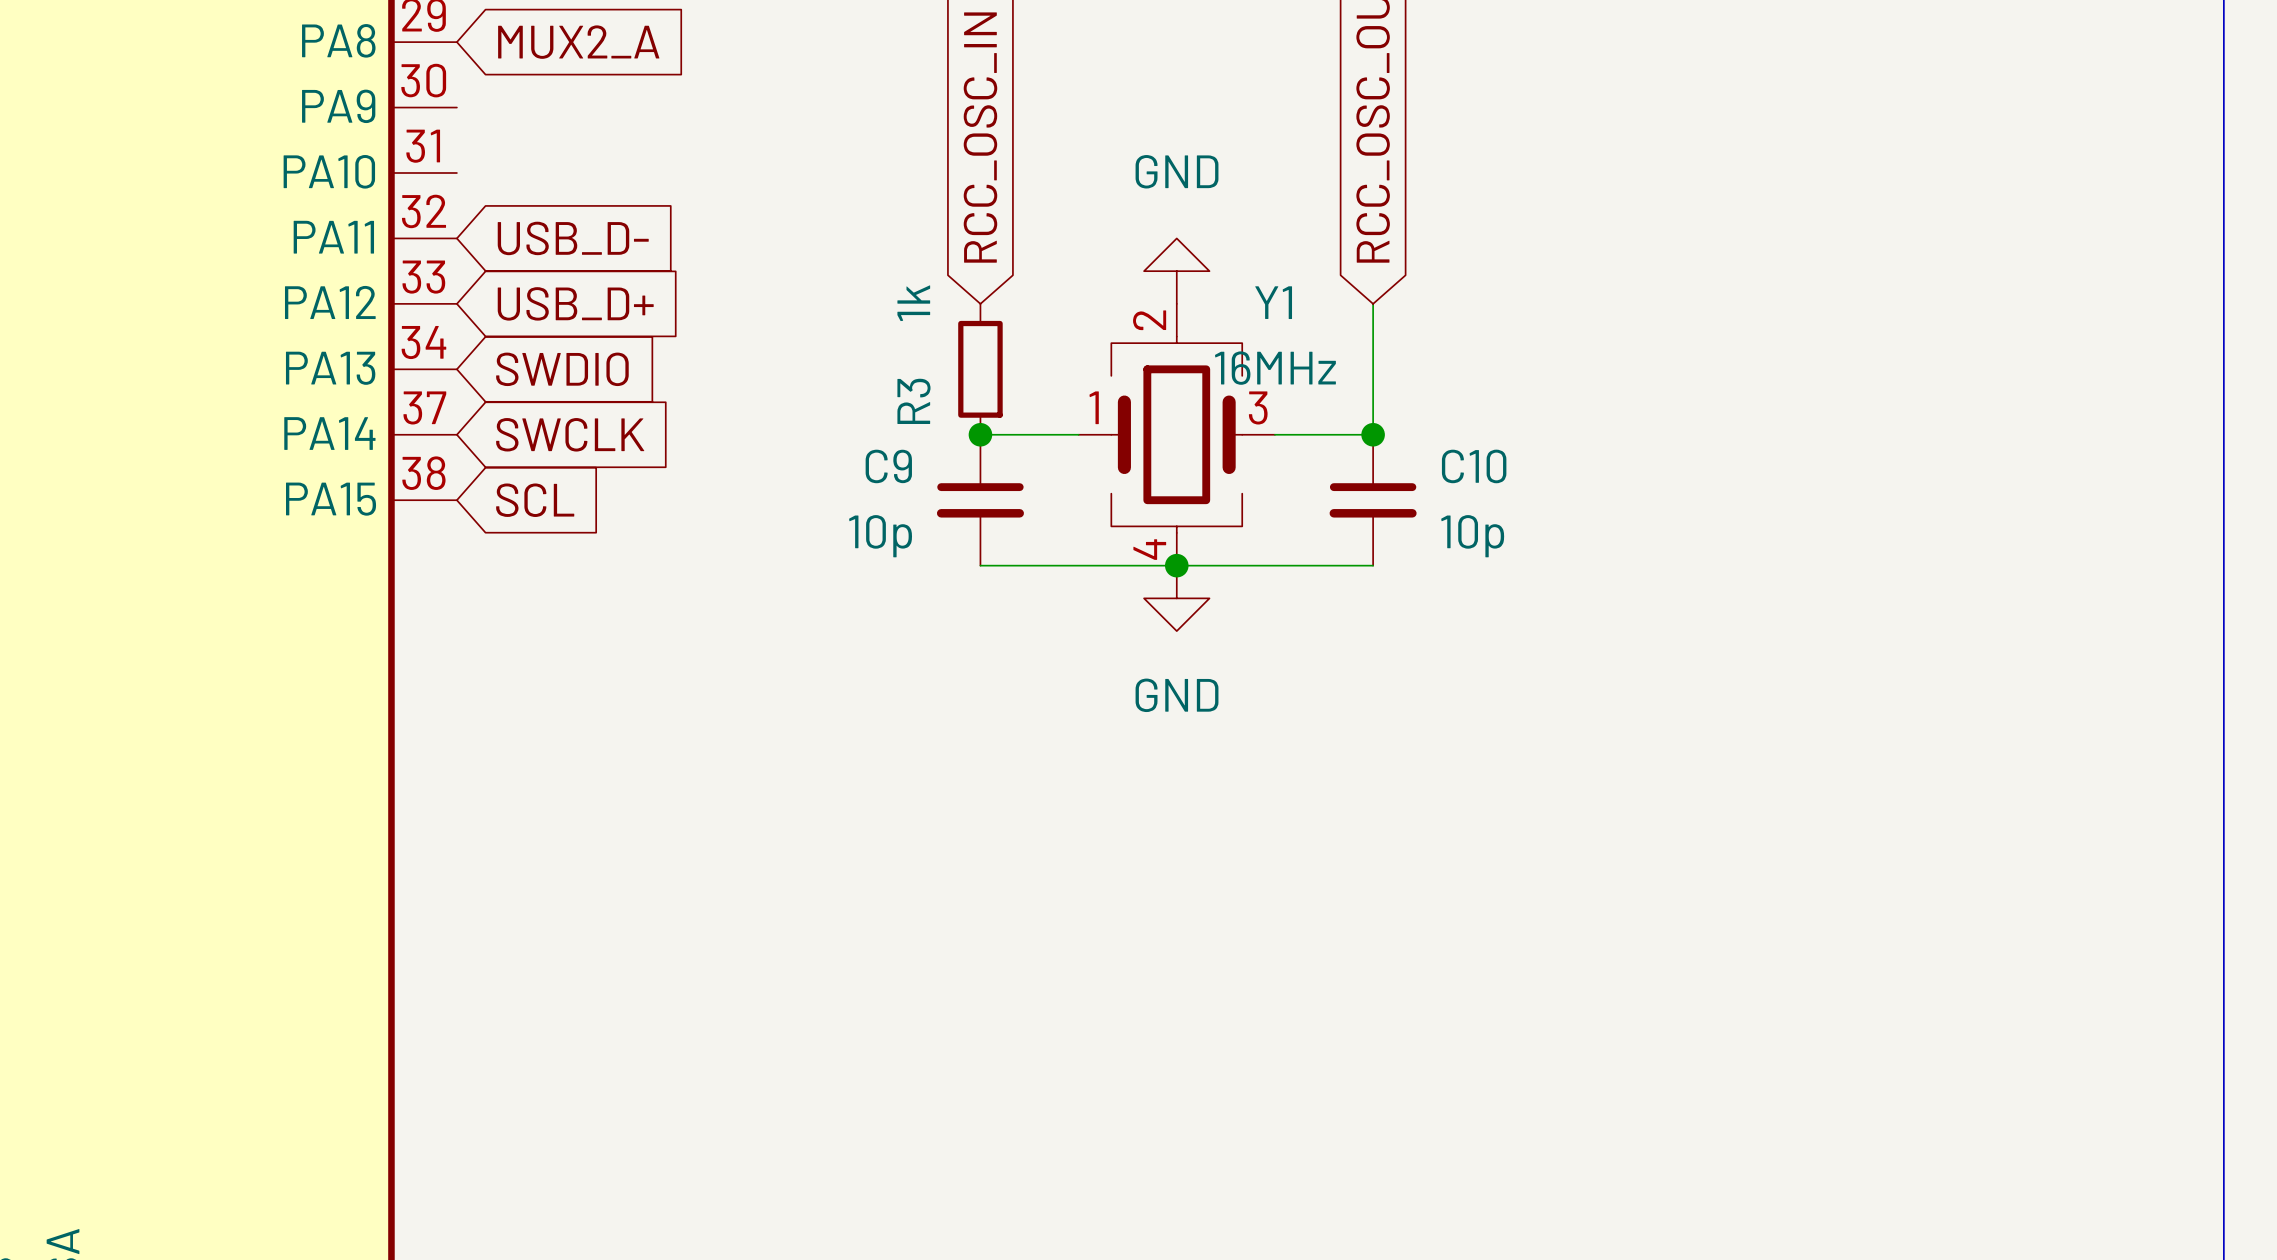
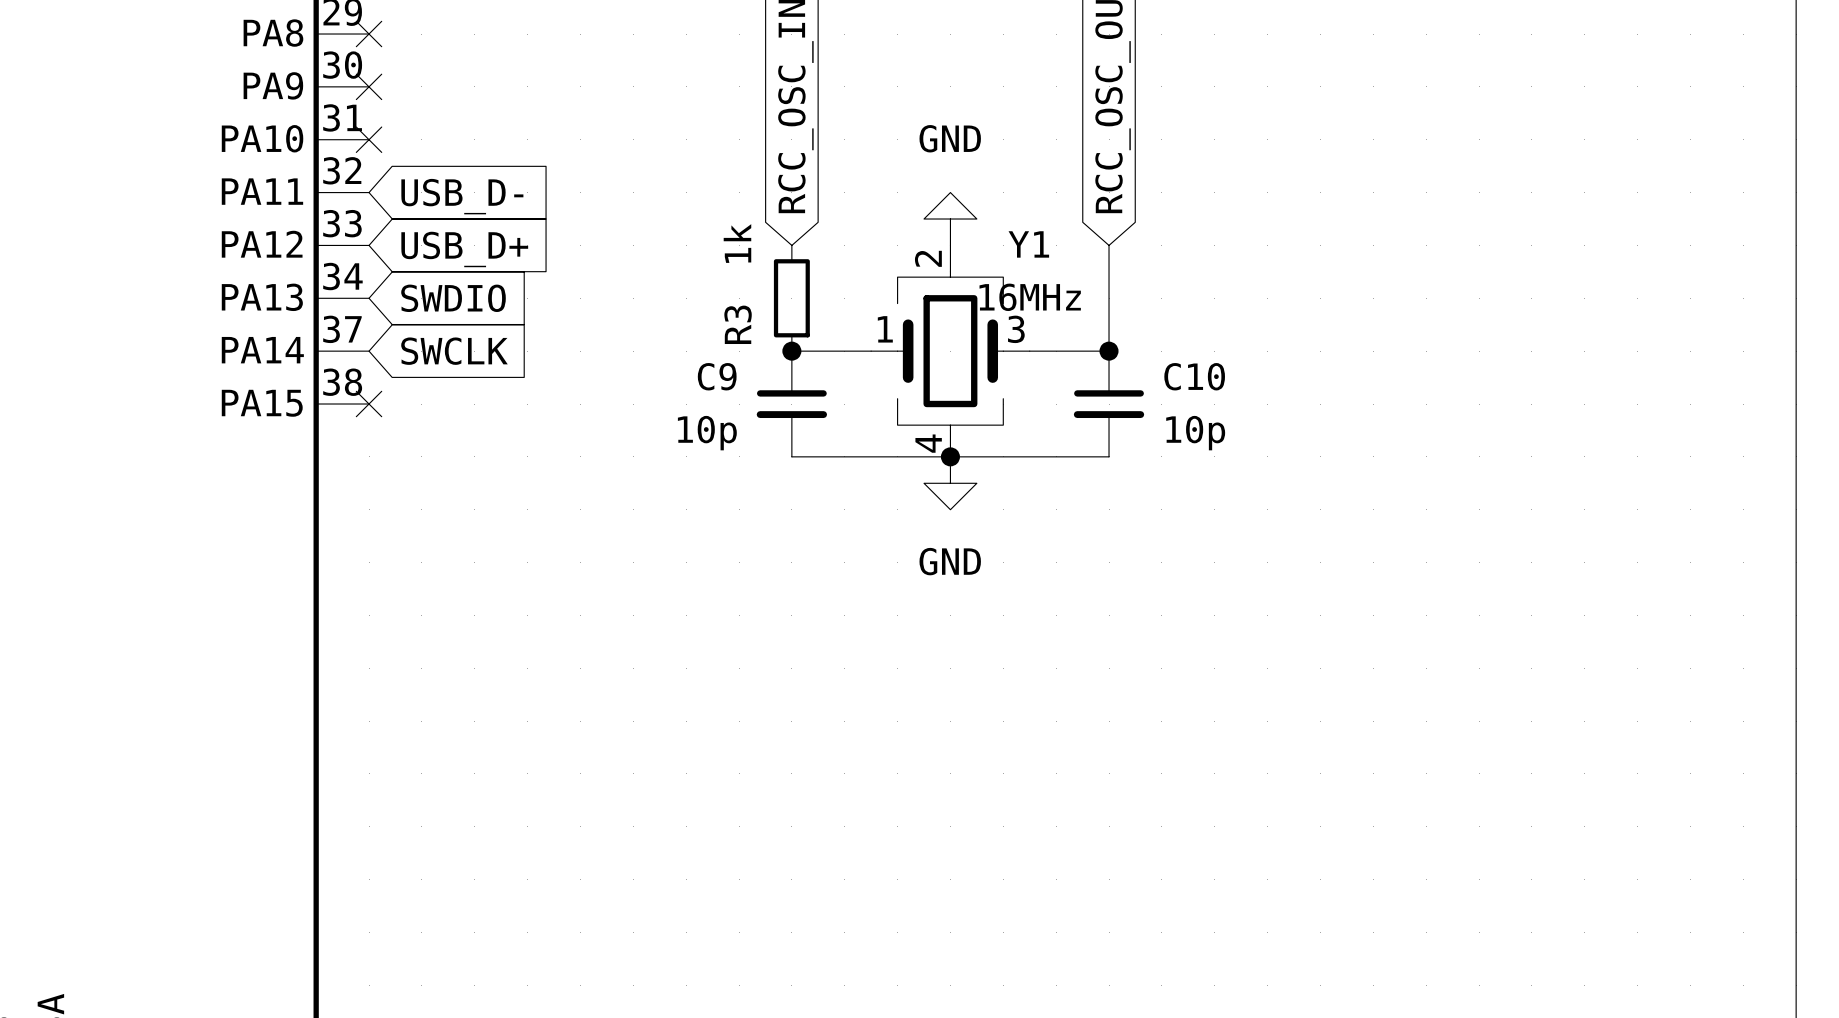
no-connect mark: none -> (369, 34)
global label: MUX2_A (578, 42) -> none
no-connect mark: none -> (369, 86)
no-connect mark: none -> (369, 139)
no-connect mark: none -> (369, 404)
global label: SCL (535, 500) -> none

